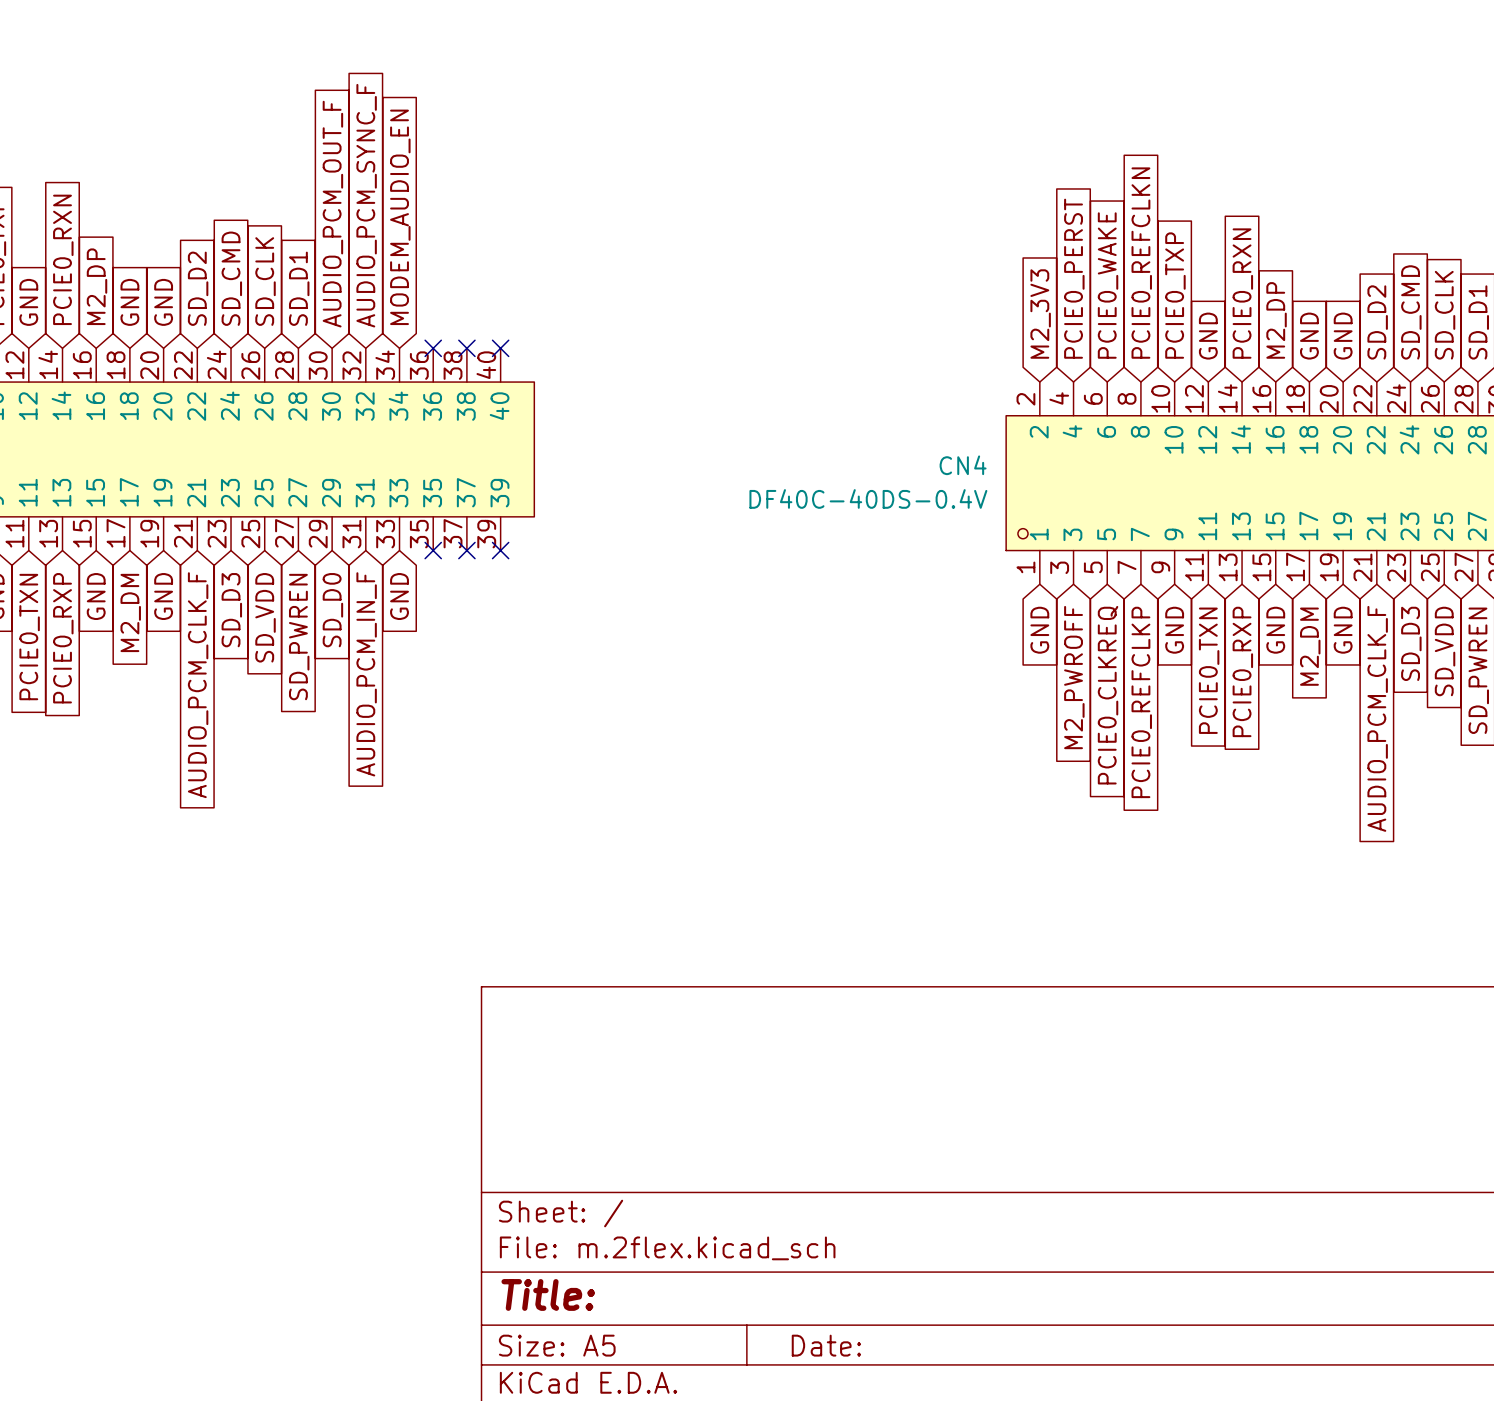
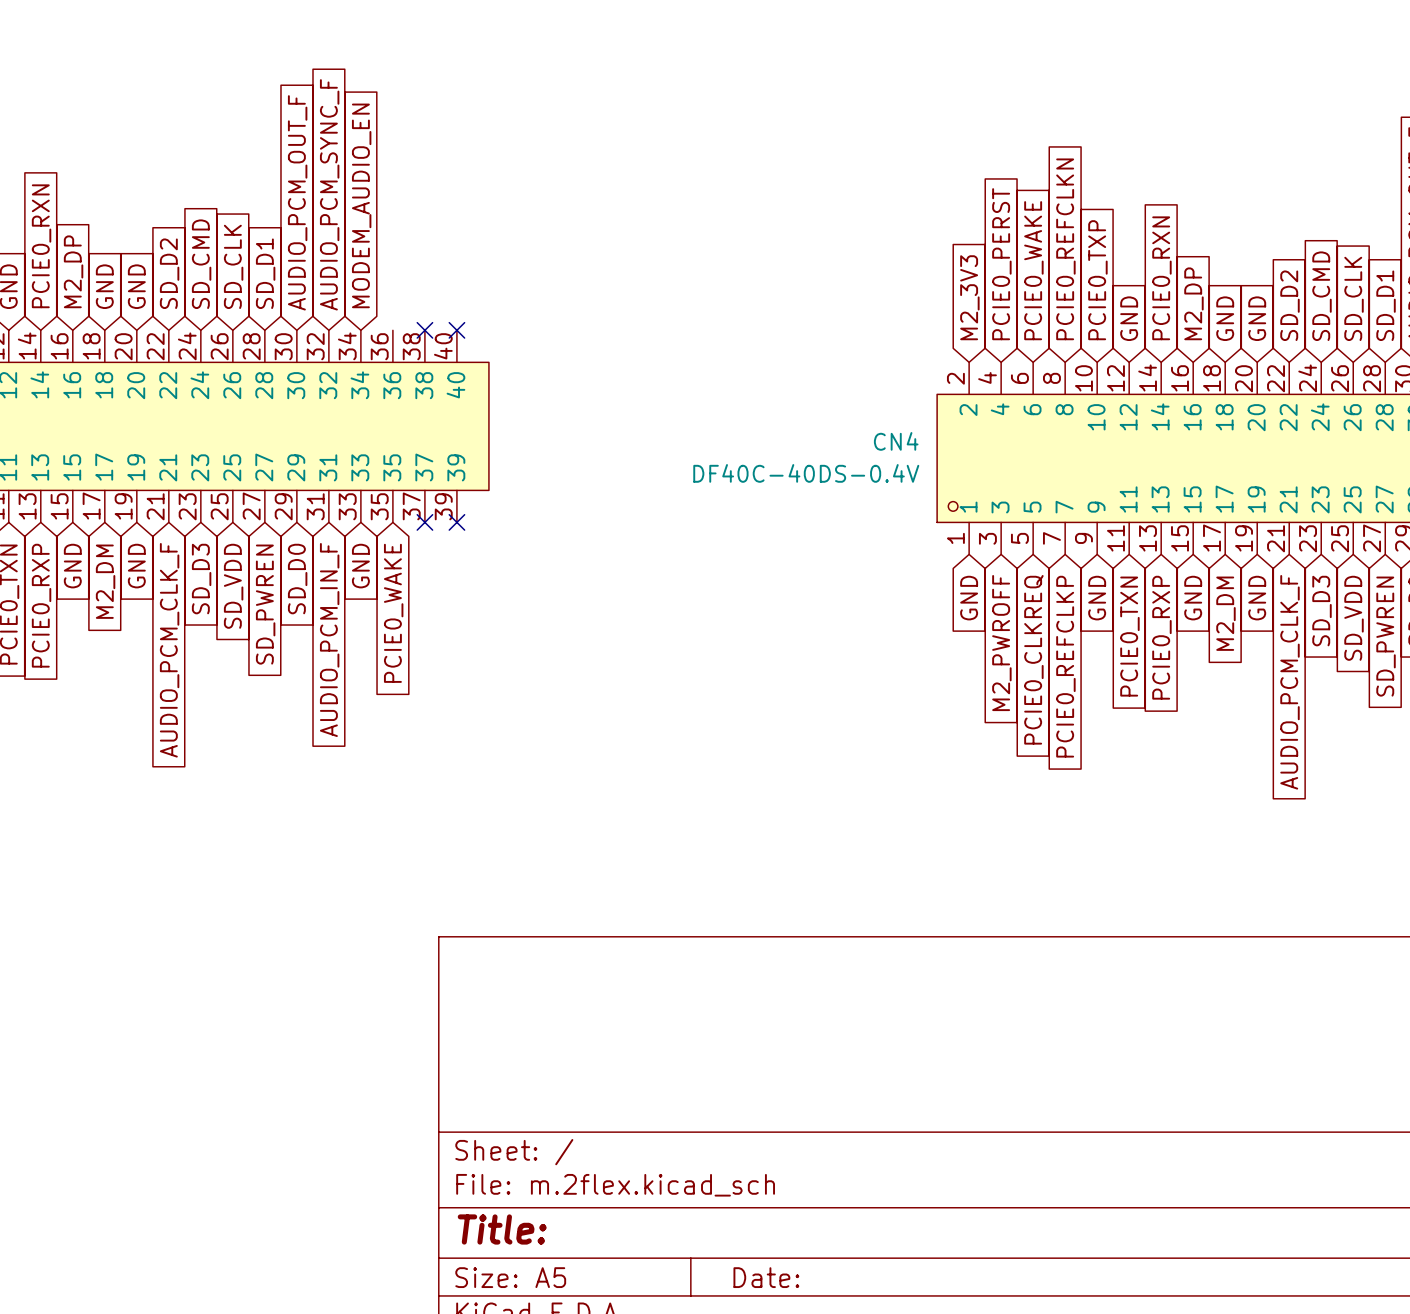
no-connect mark: (433, 348) -> none
no-connect mark: (433, 550) -> none
global label: none -> PCIE0_WAKE (393, 613)

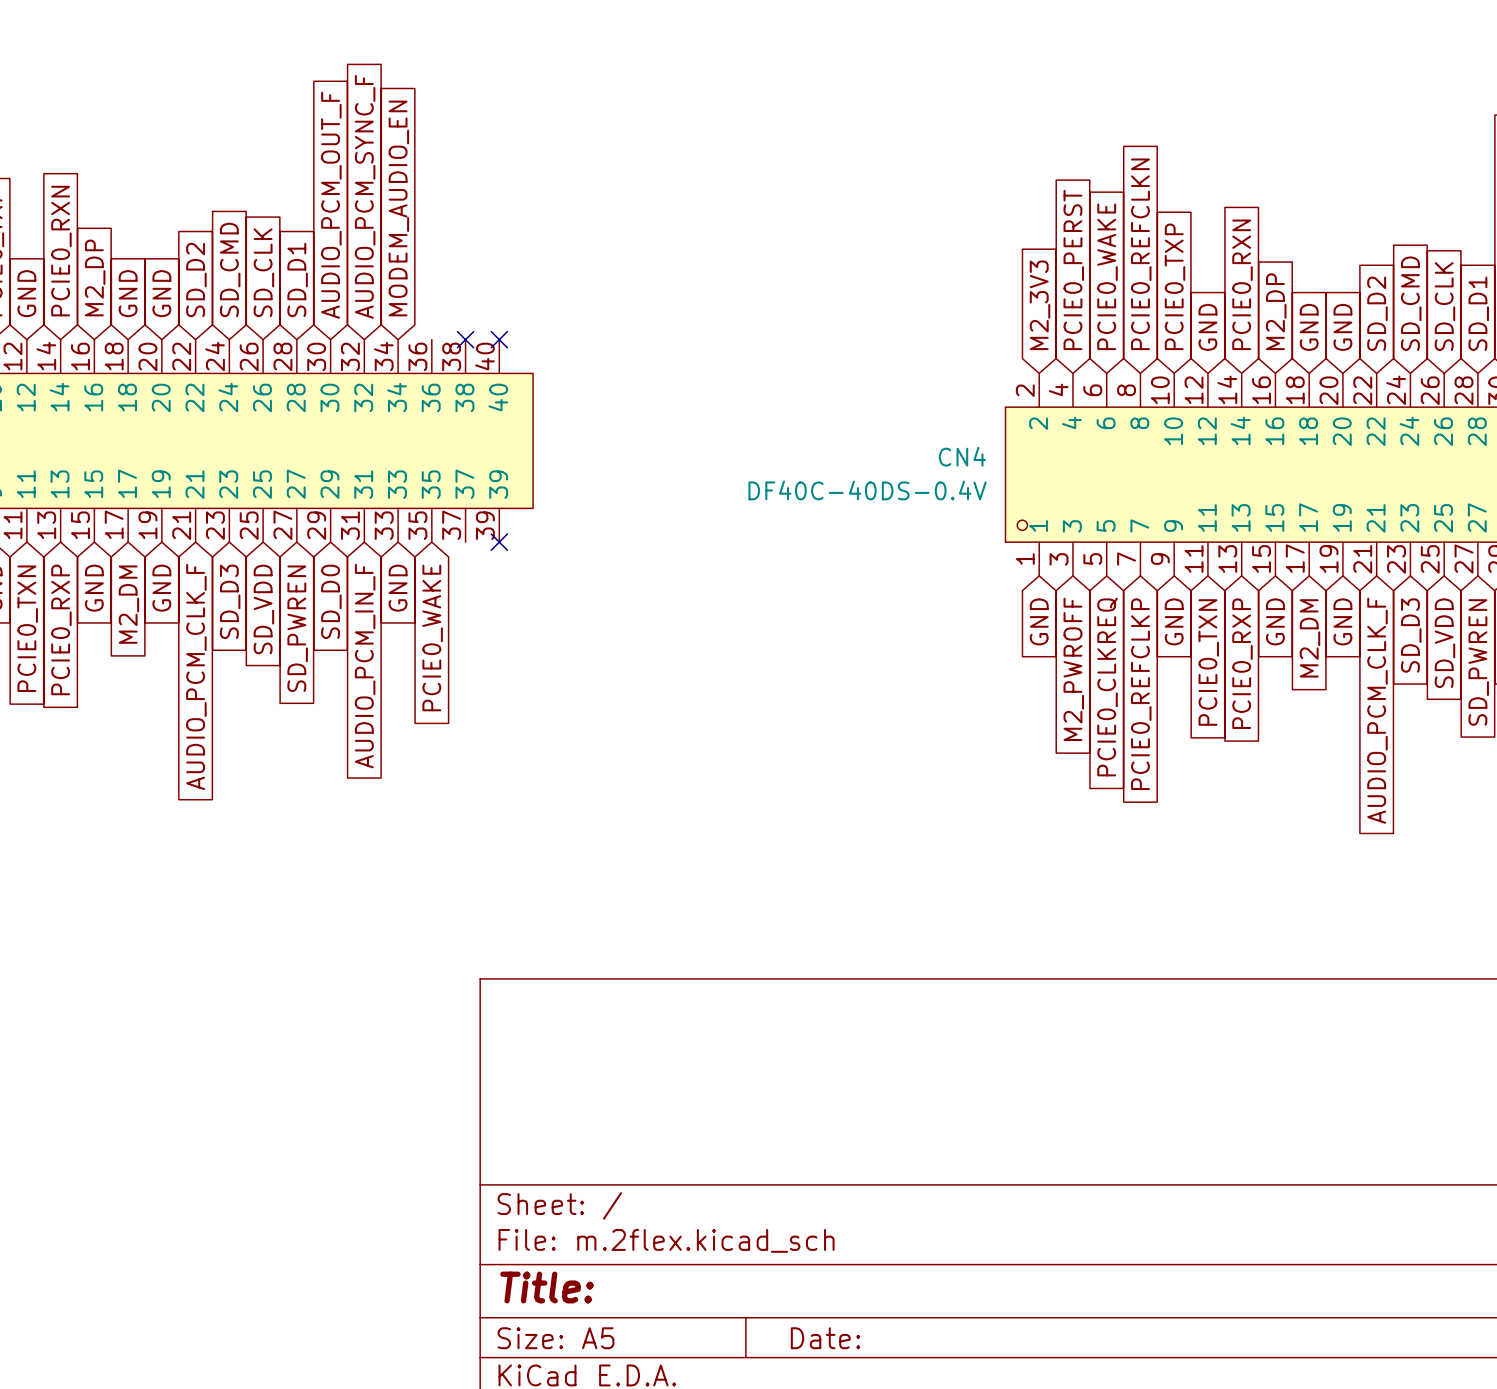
no-connect mark: (424, 522) -> none

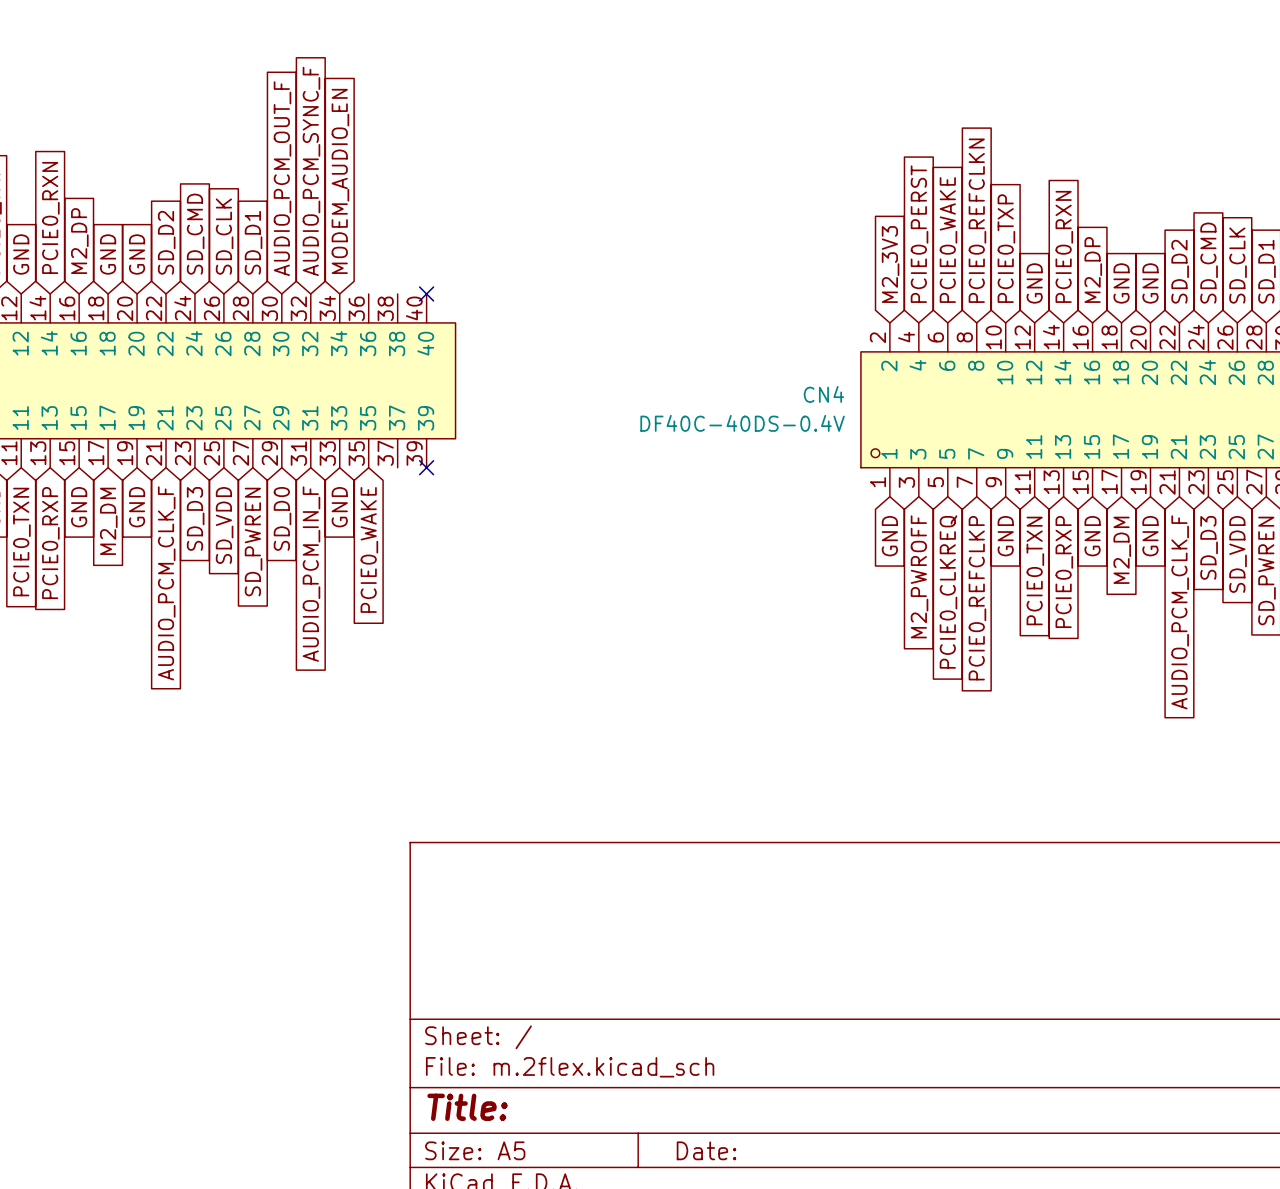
no-connect mark: (465, 339) -> none

